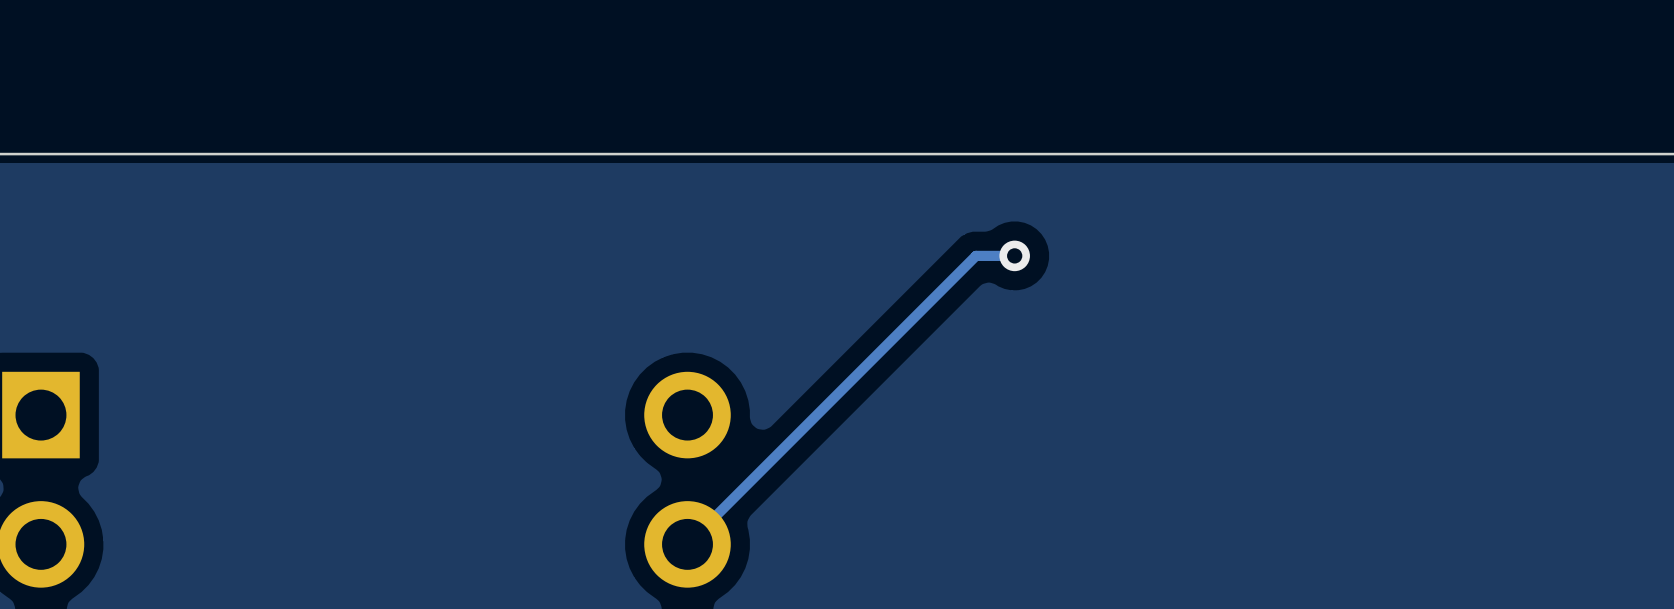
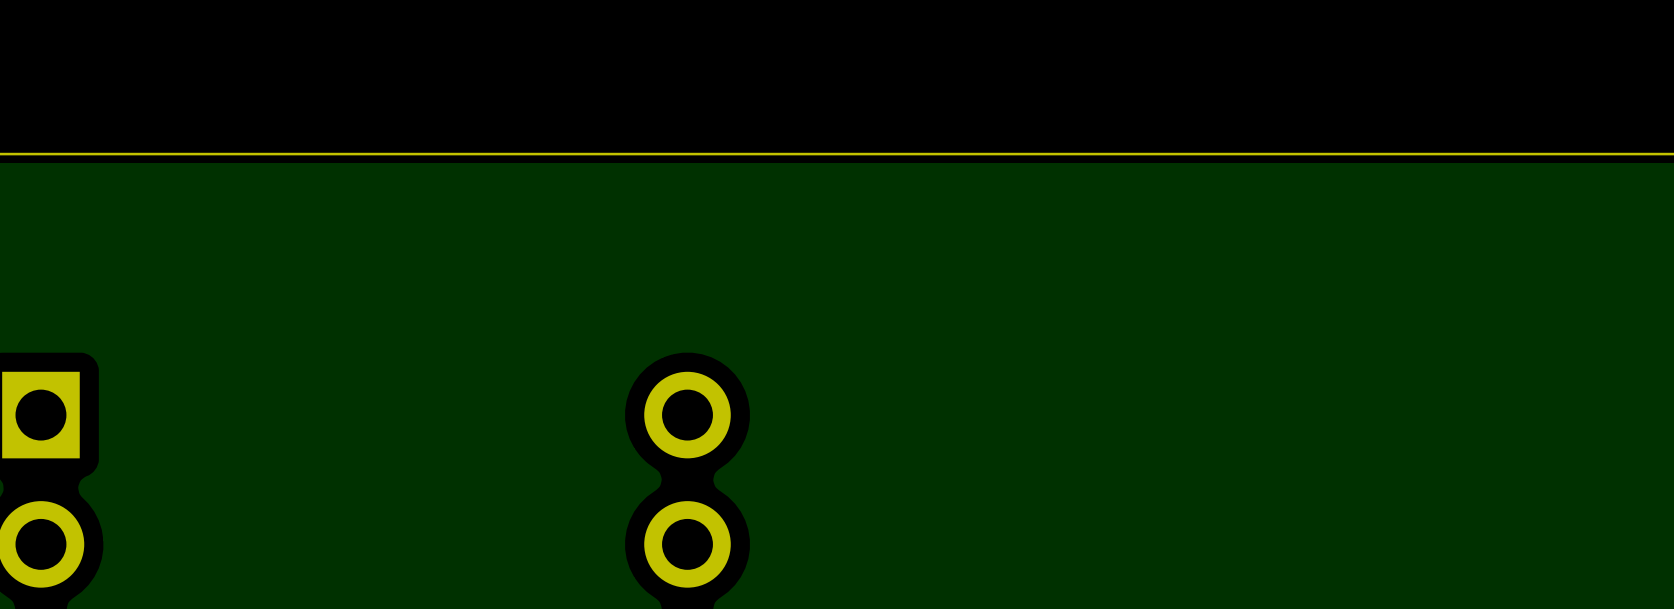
track: (1014, 255) (975, 255) (687, 544) -> none
via: (1014, 255) -> none

